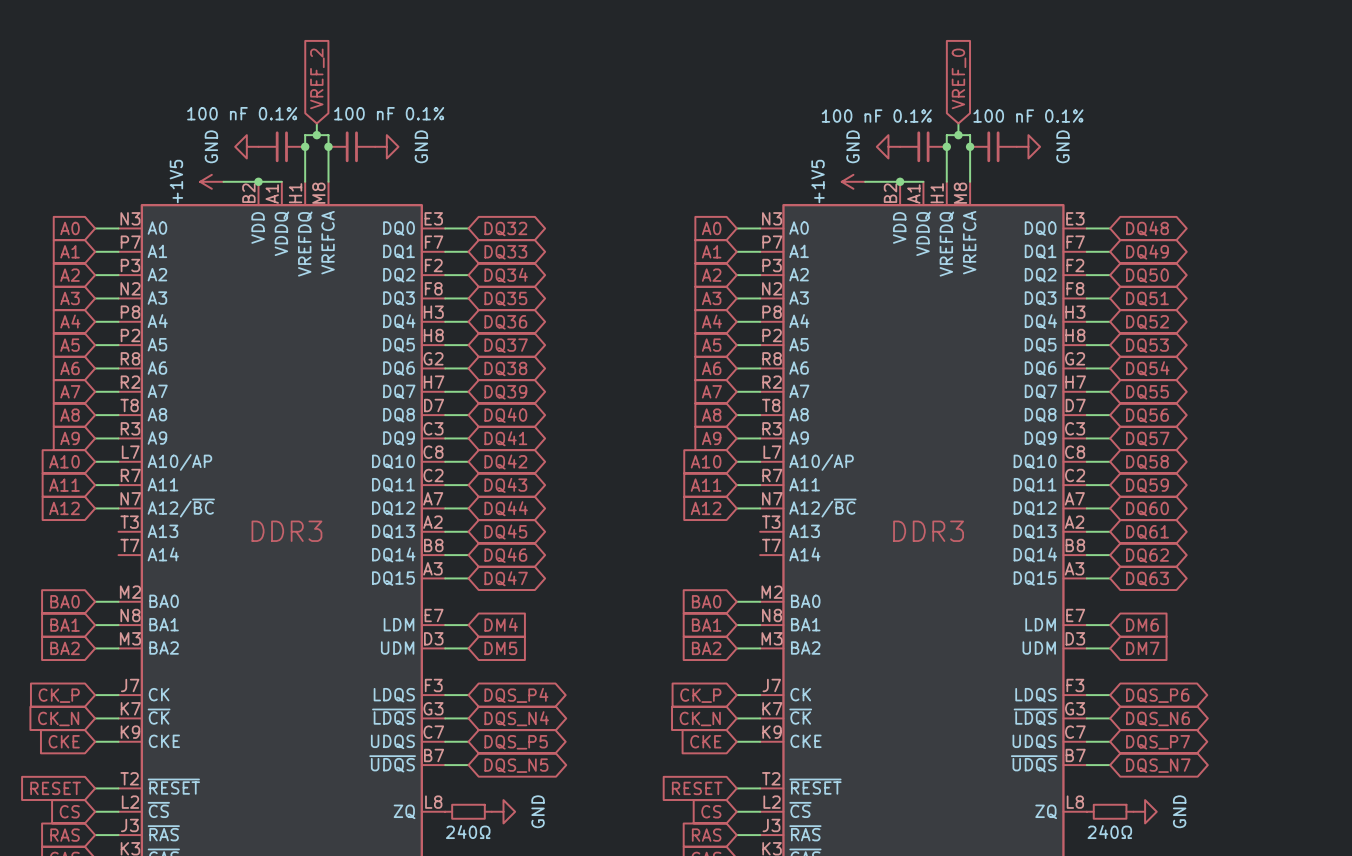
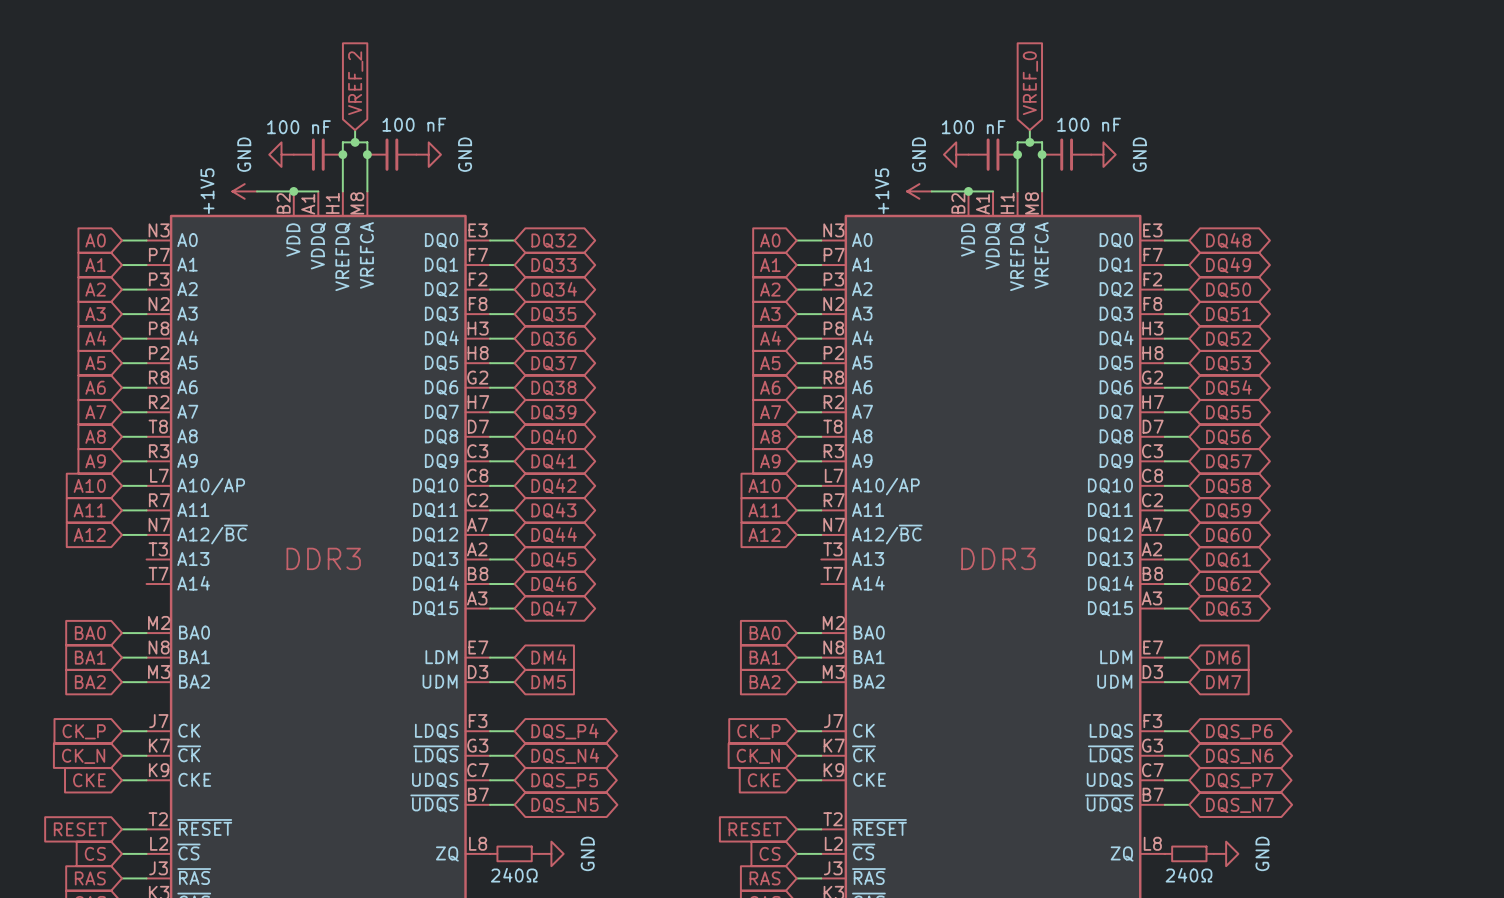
part value: 100 nF 0.1% (242, 113) -> 100 nF (298, 127)
part value: 100 nF 0.1% (389, 113) -> 100 nF (414, 124)
part value: 100 nF 0.1% (876, 116) -> 100 nF (973, 127)
part value: 100 nF 0.1% (1028, 116) -> 100 nF (1089, 124)

